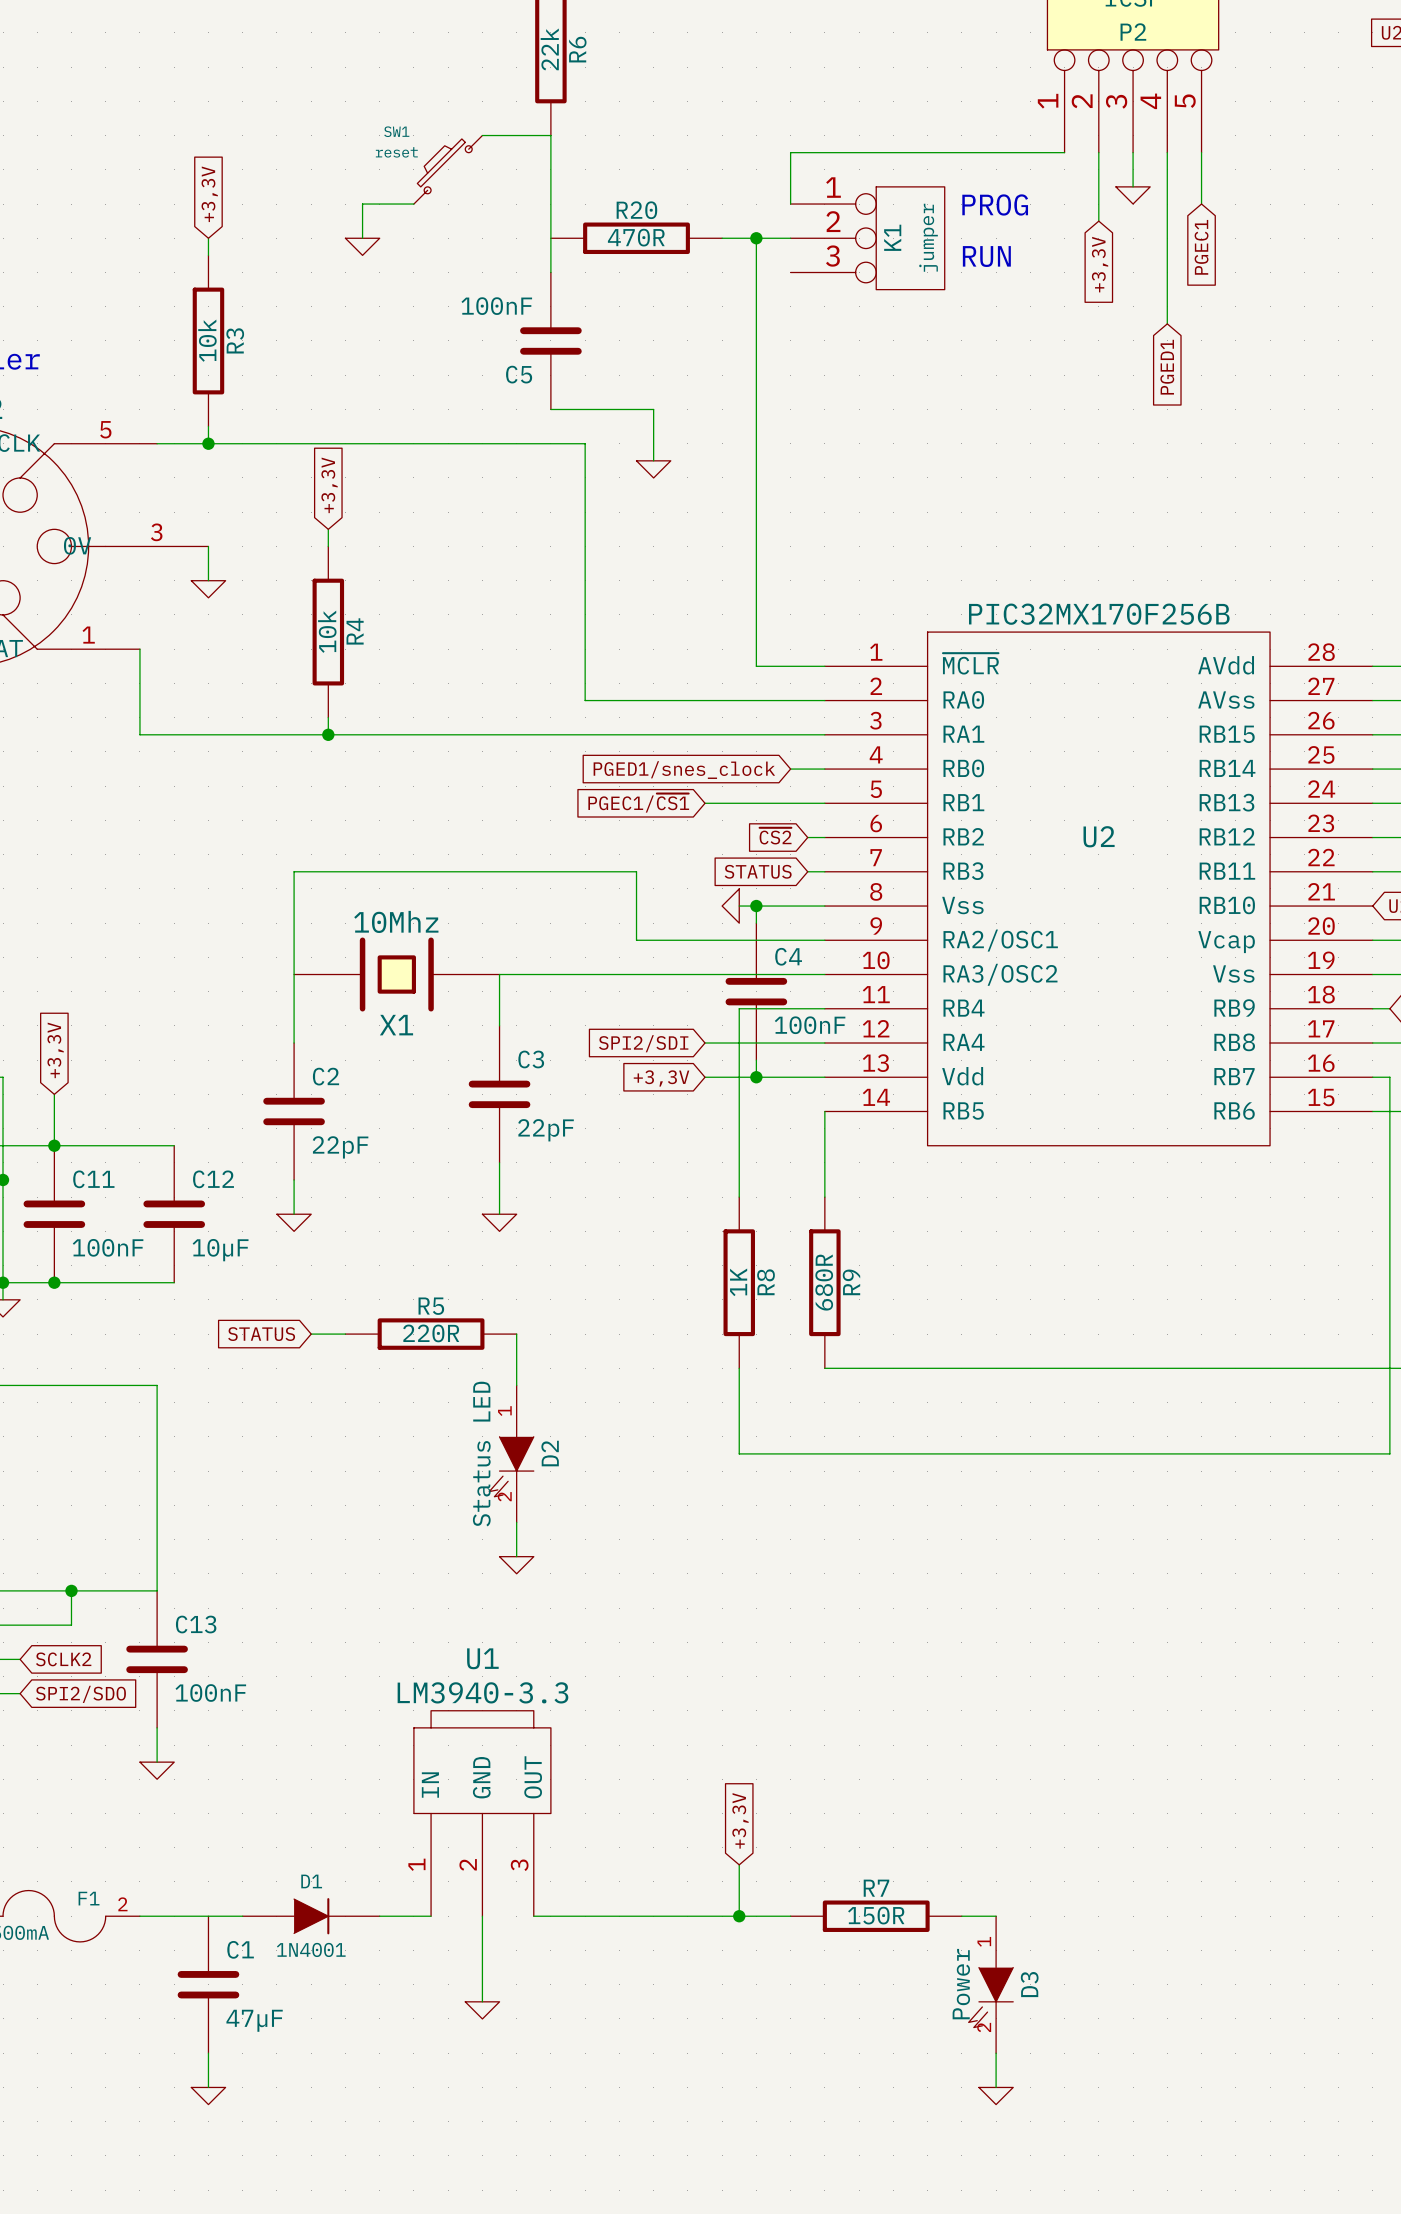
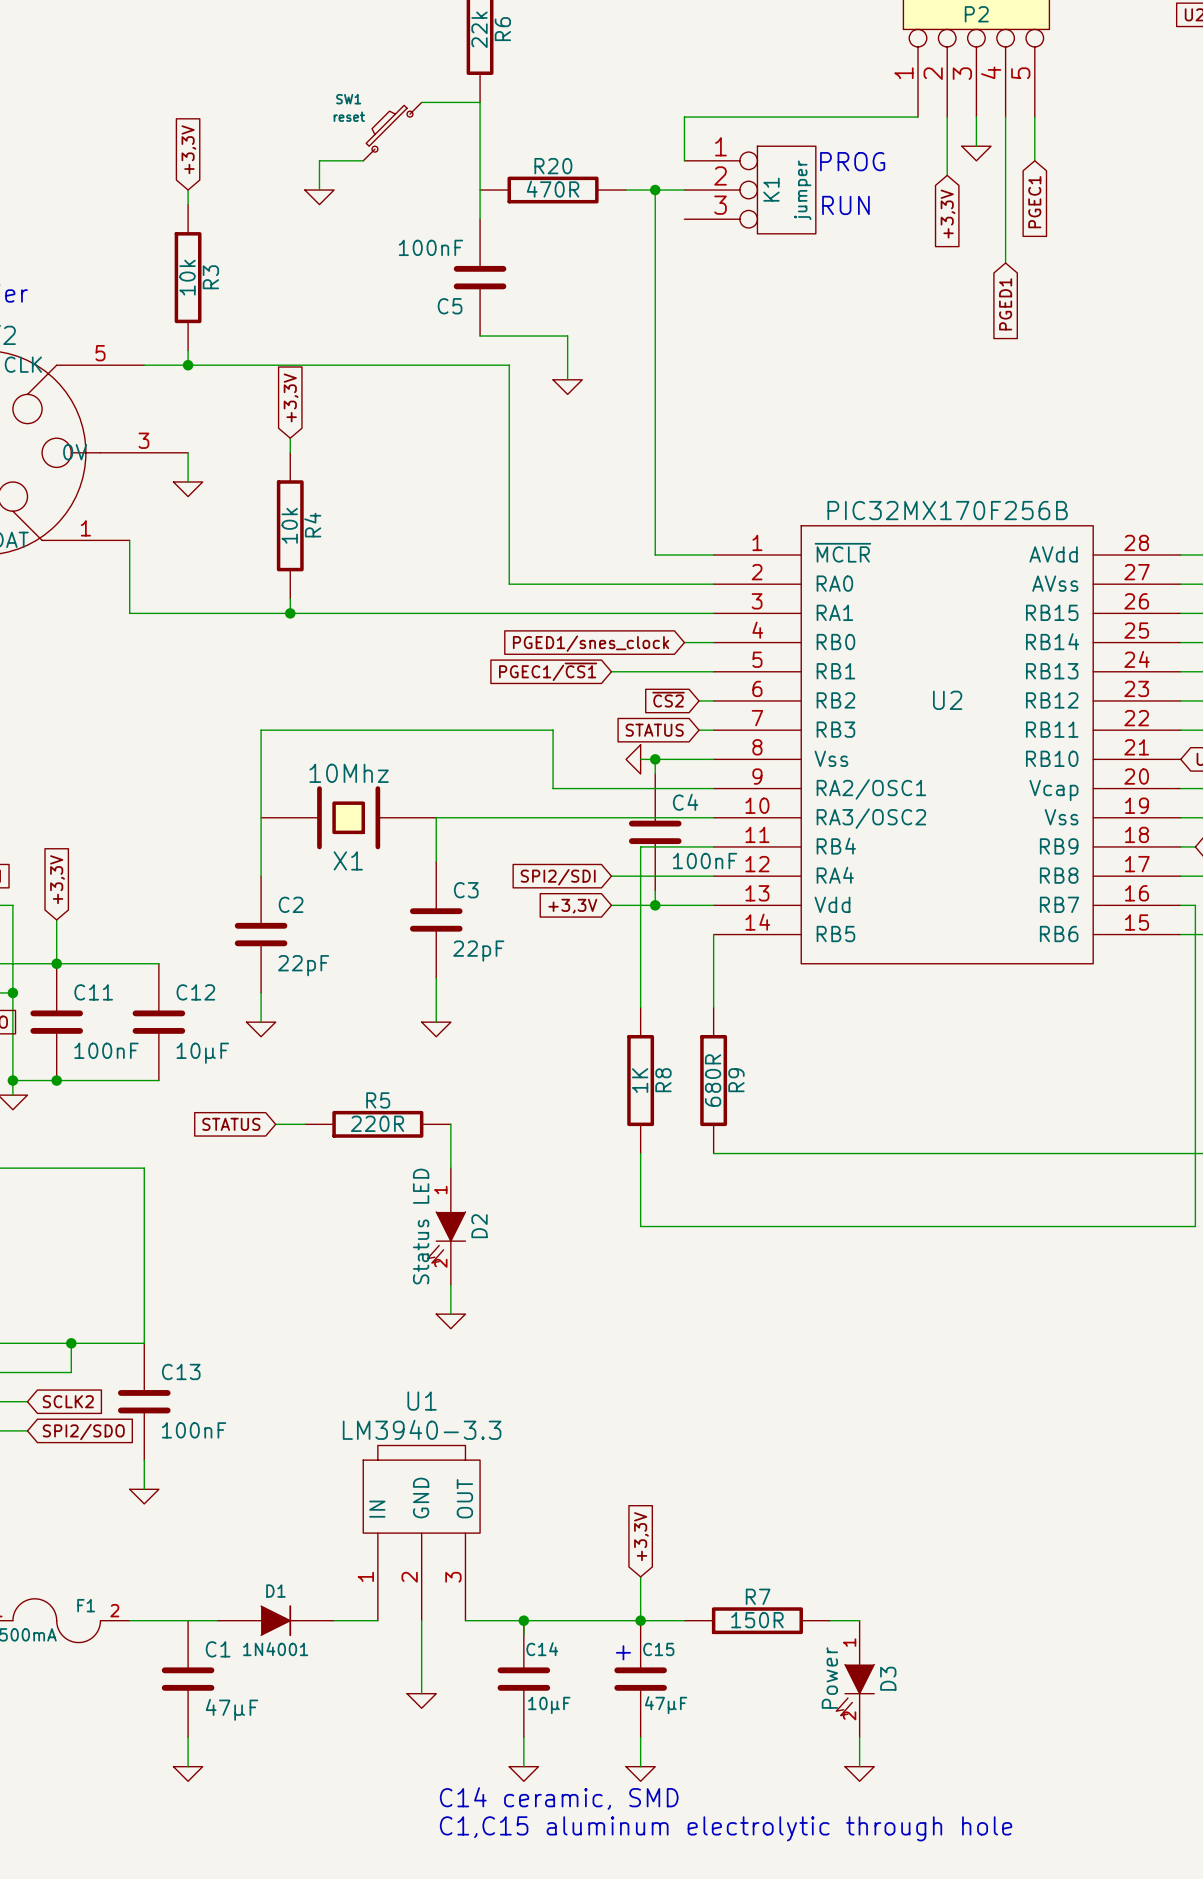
wire: none -> (523, 1620) (523, 1635)
junction: none -> (523, 1620)
text: none -> + (623, 1652)
C14: none -> 10µF (523, 1679)
C15: none -> 47µF (640, 1679)
wire: none -> (523, 1737) (523, 1766)
wire: none -> (640, 1737) (640, 1766)
power symbol: none -> (523, 1773)
power symbol: none -> (640, 1773)
text: none -> C14 ceramic, SMD (559, 1798)
text: none -> C1,C15 aluminum electrolytic through hole (726, 1828)

